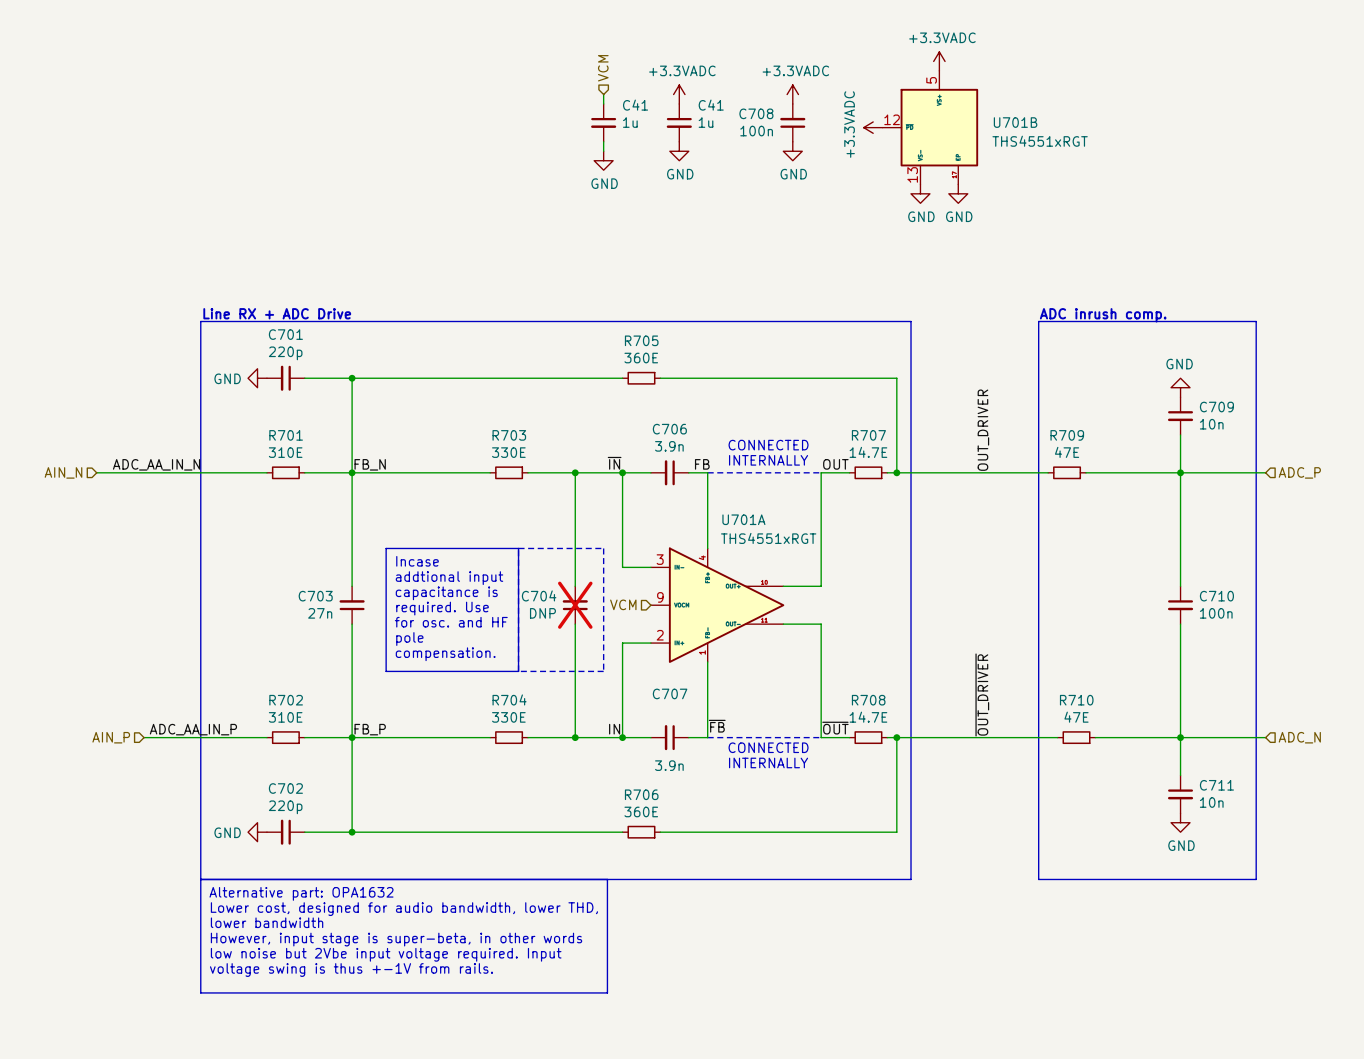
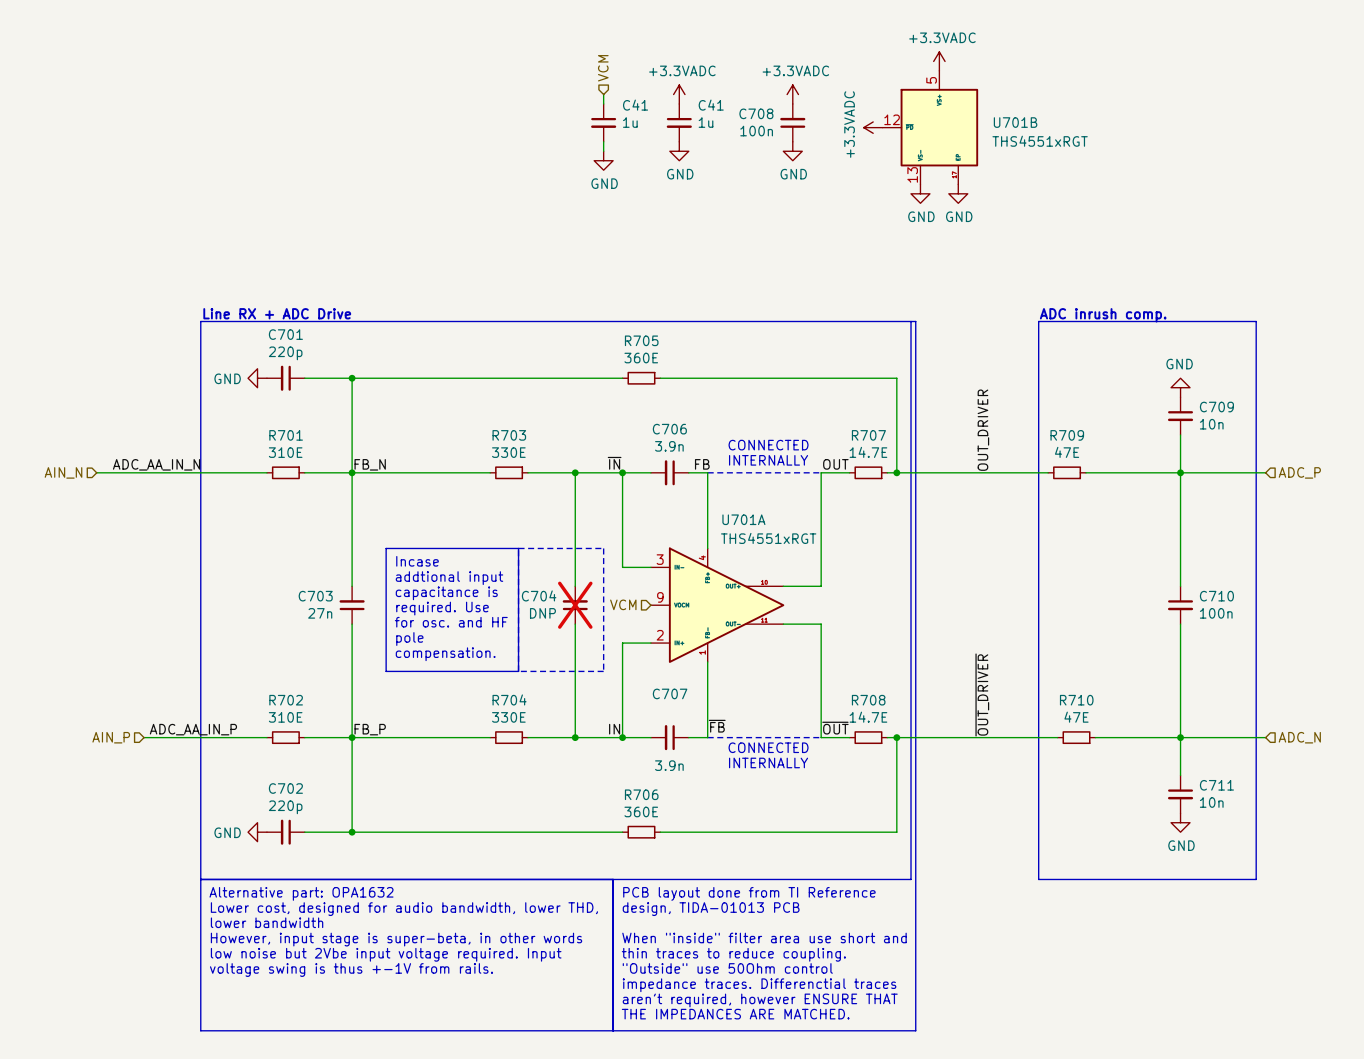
line: (607, 879) (607, 992) (200, 992) -> (911, 321) (915, 321) (915, 1030) (200, 1030) (200, 992)
line: none -> (613, 879) (613, 1030)
text: none -> PCB layout done from TI Reference (749, 893)
text: none -> design, TIDA-01013 PCB (711, 909)
text: none -> When "inside" filter area use short and (764, 937)
text: none -> thin traces to reduce coupling. (733, 954)
text: none -> "Outside" use 50Ohm control (727, 968)
text: none -> impedance traces. Differenctial traces (759, 985)
text: none -> aren't required, however ENSURE THAT (760, 1000)
text: none -> THE IMPEDANCES ARE MATCHED. (735, 1014)

